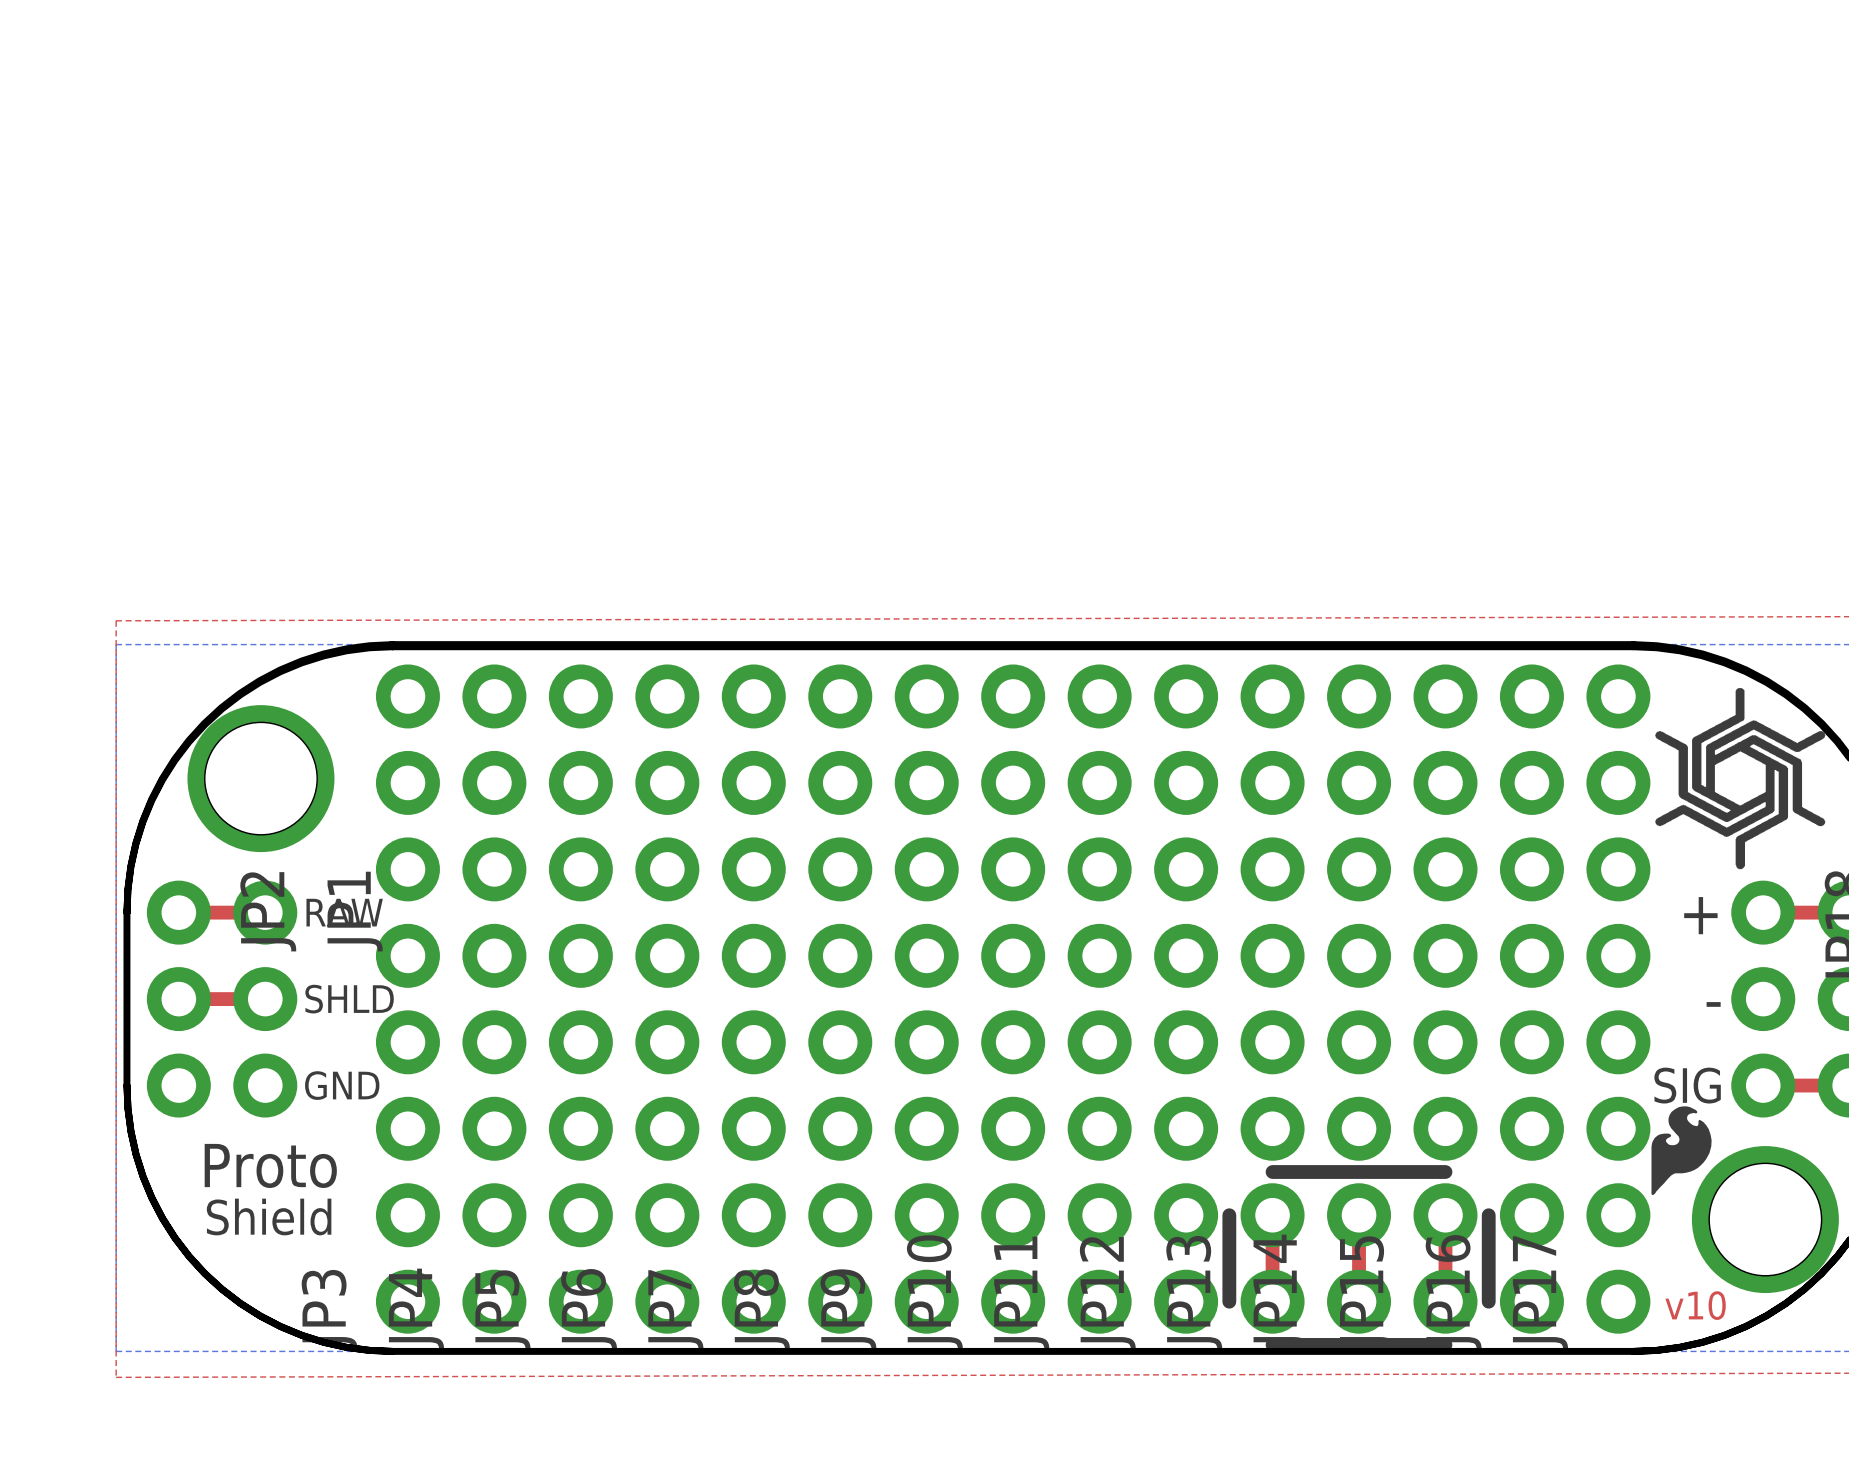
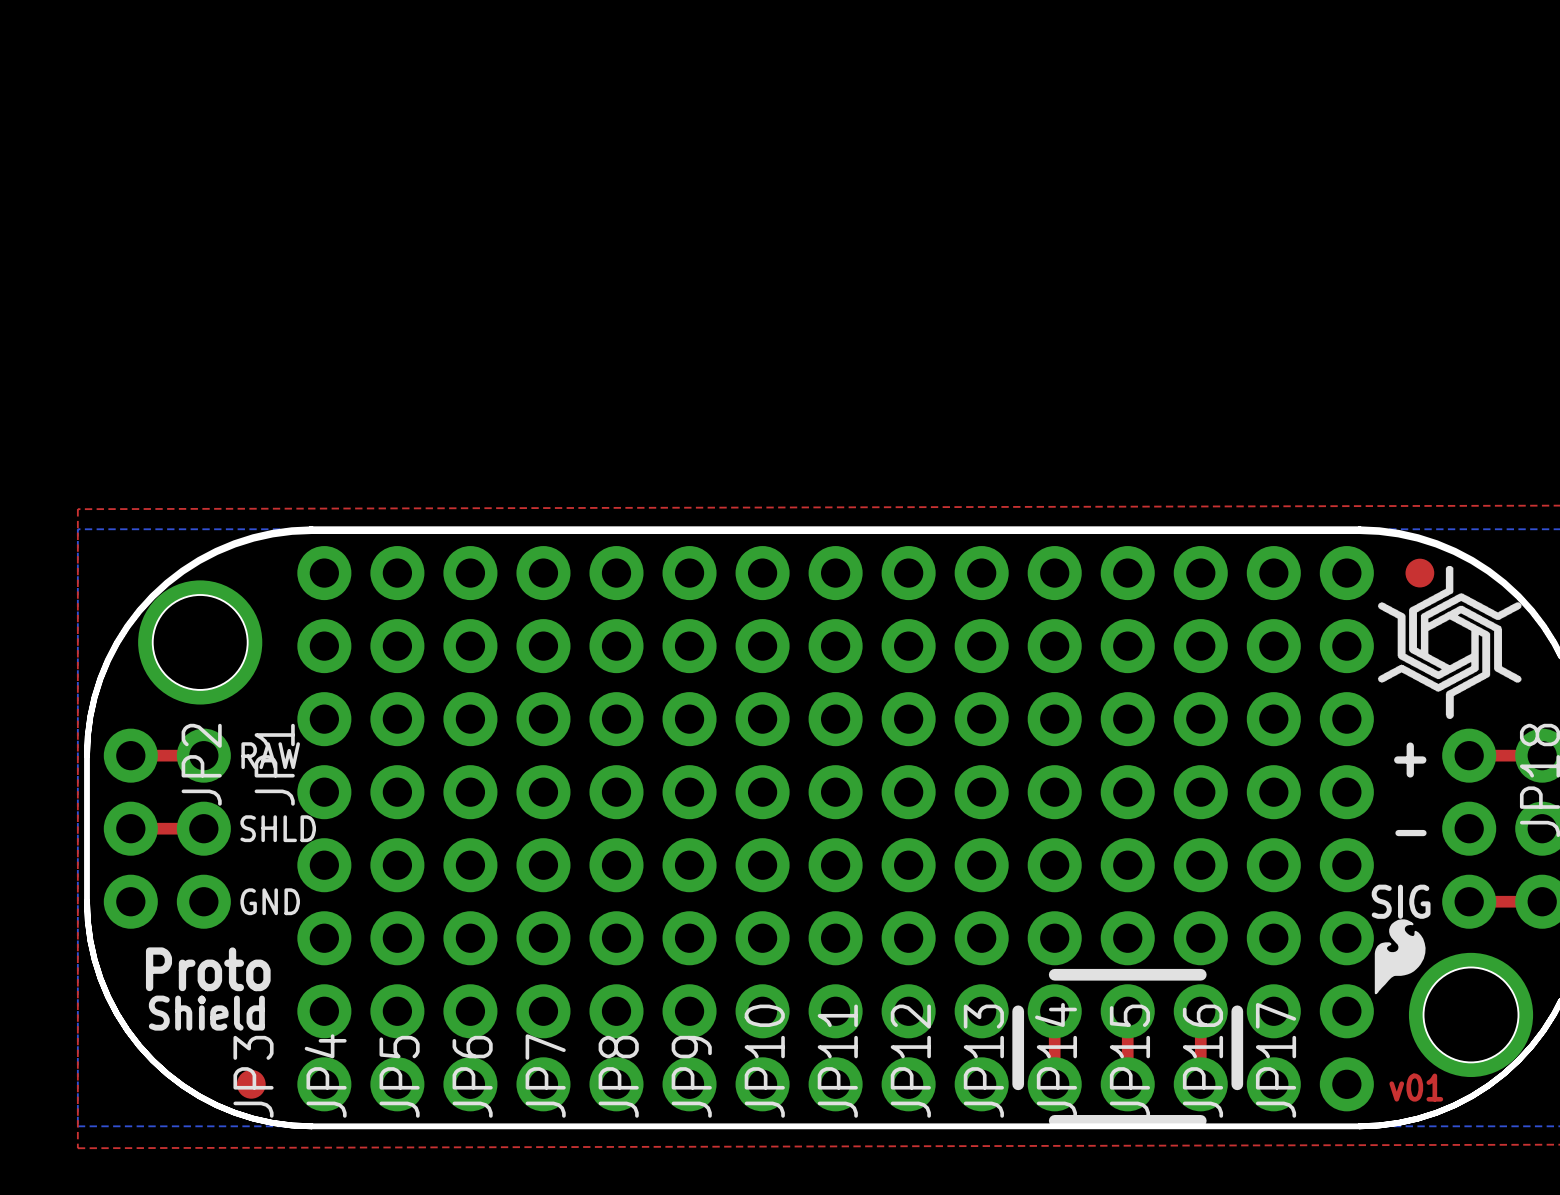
part: none -> (1419, 573)
part: none -> (251, 1084)
text: v10 (1695, 1305) -> v01 (1416, 1087)

